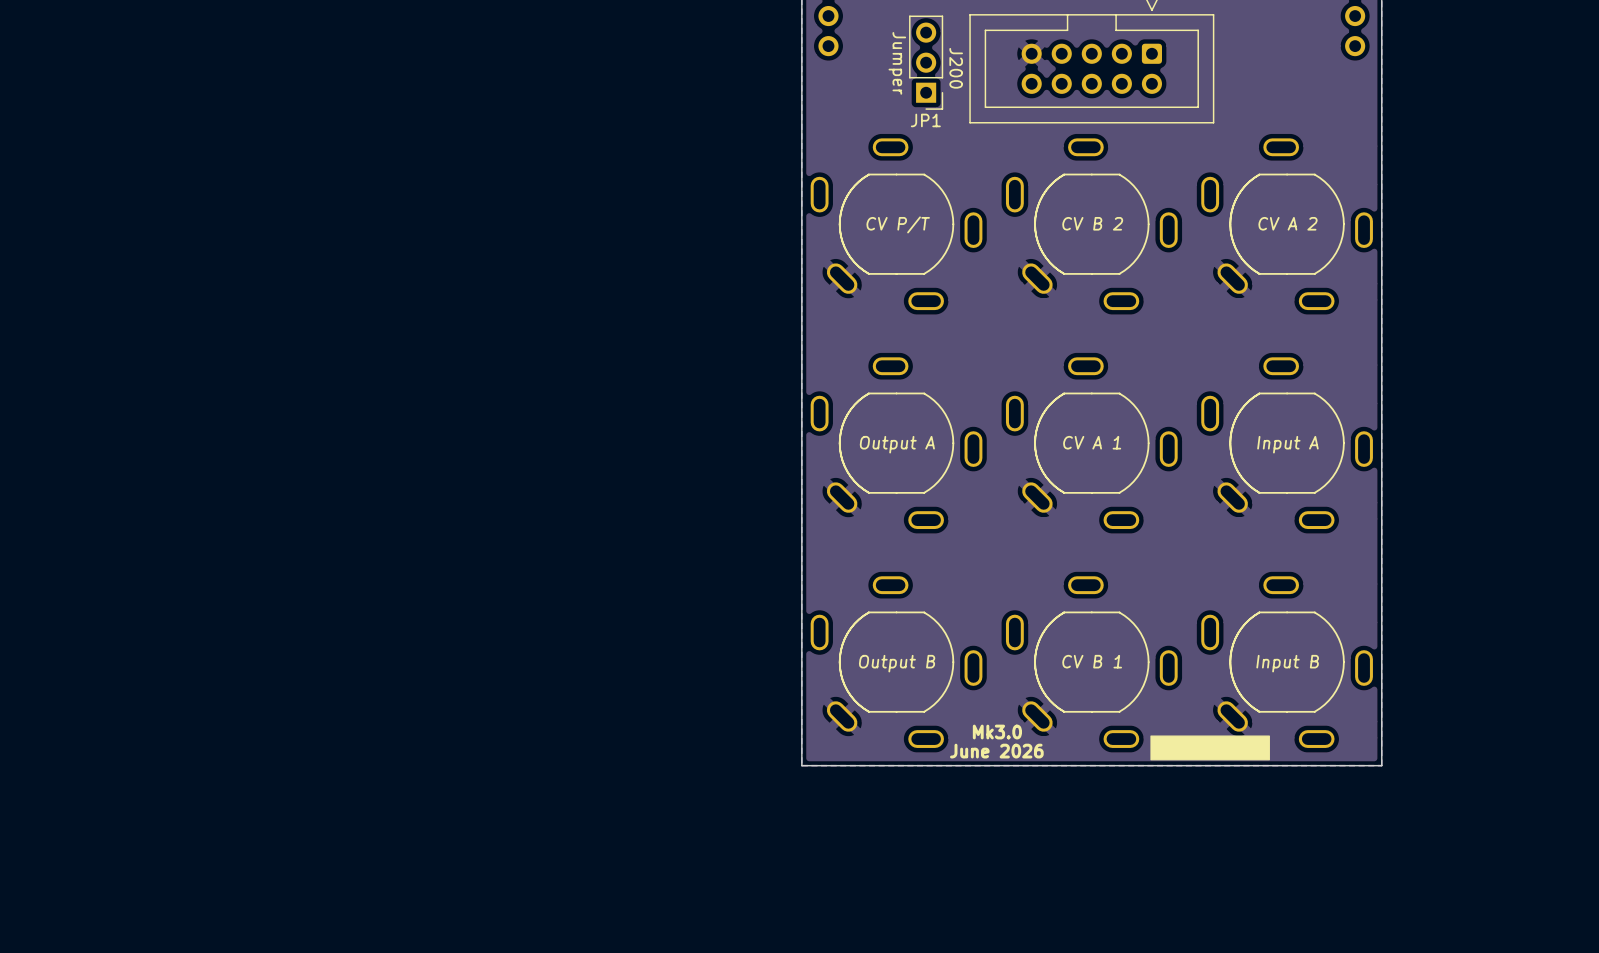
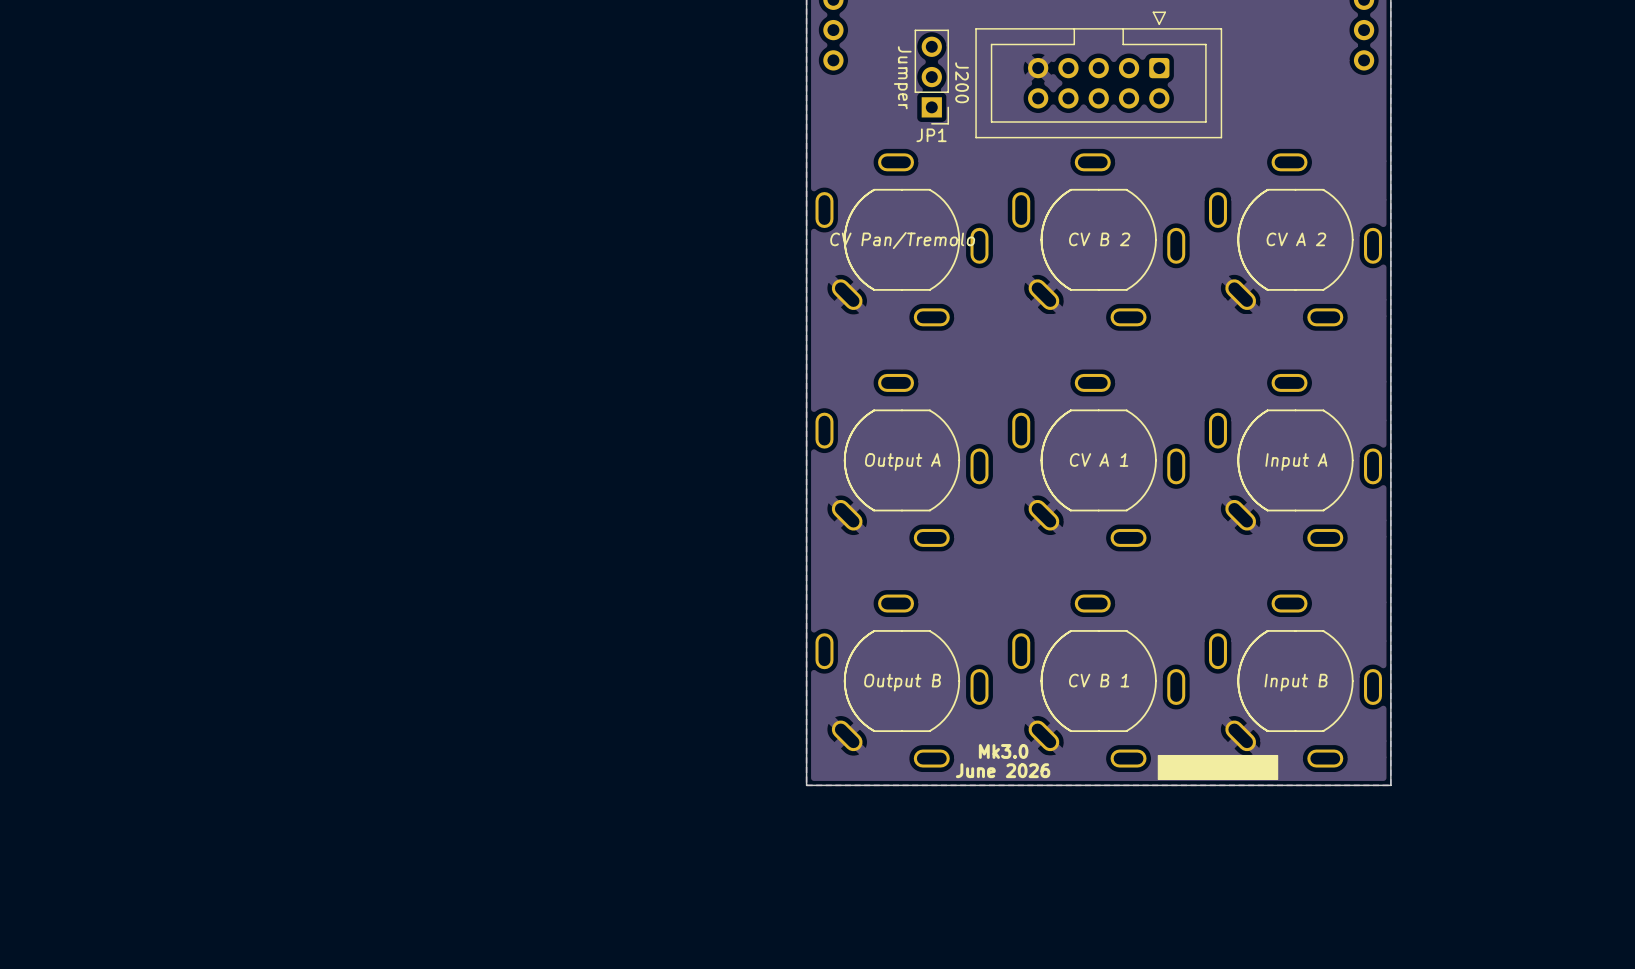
part text: CV P/T (898, 224) -> CV Pan/Tremolo (902, 240)

